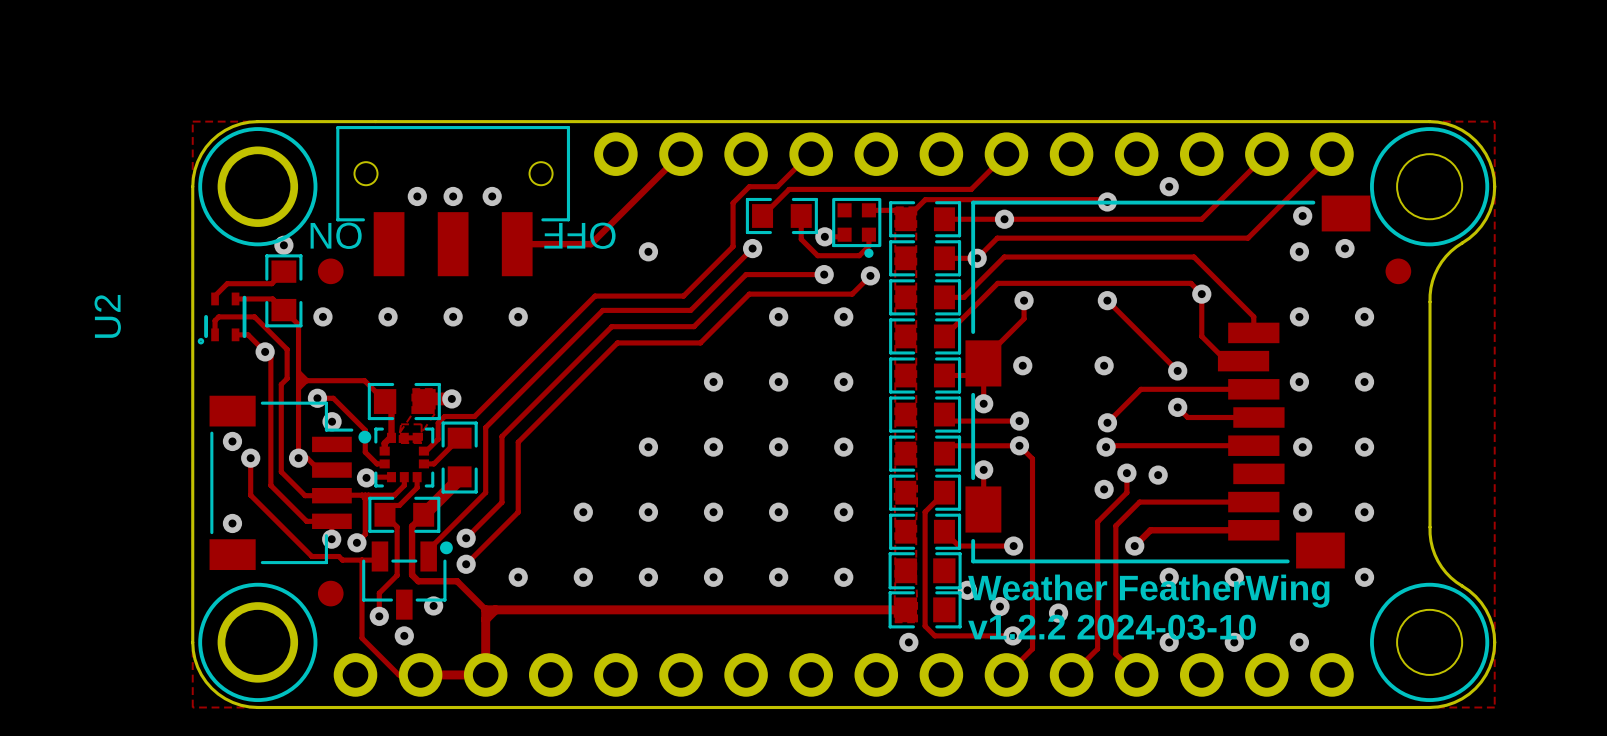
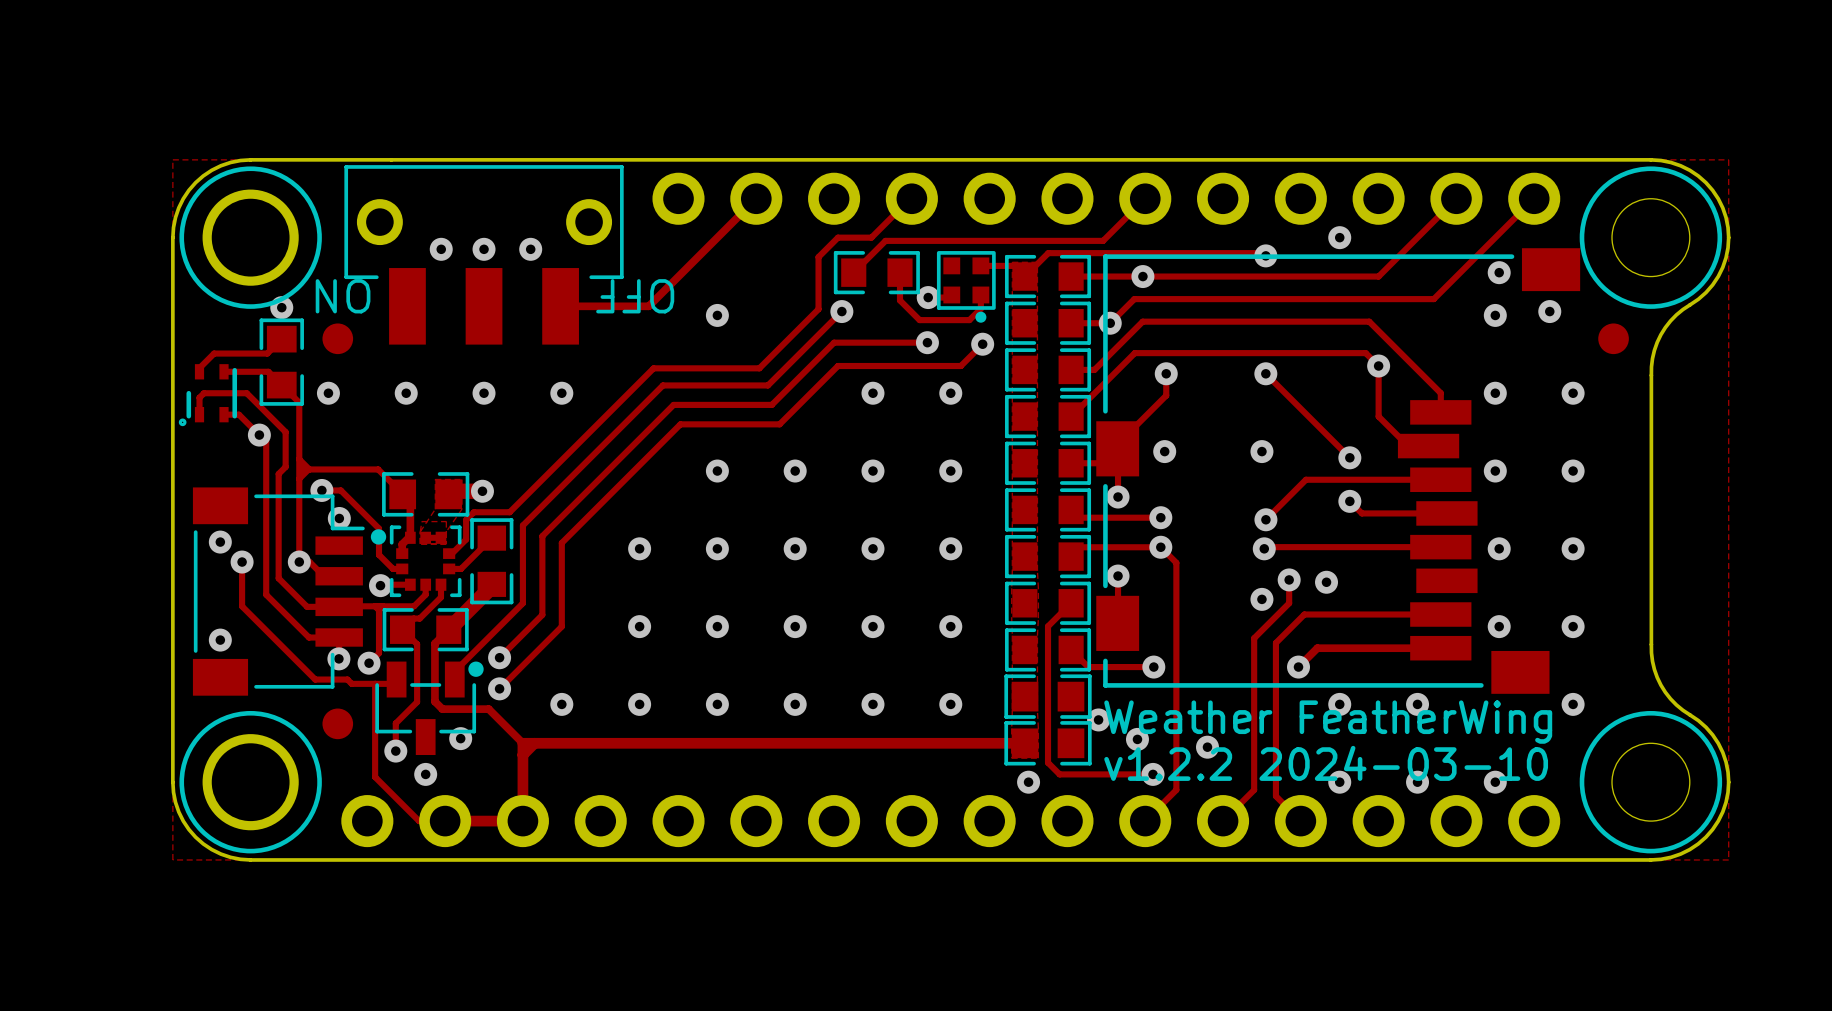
part footprint: [336, 126, 571, 277] -> [344, 165, 624, 345]
U2 name: U2 (107, 316) -> none
via: none -> (717, 471)
via: none -> (639, 548)

